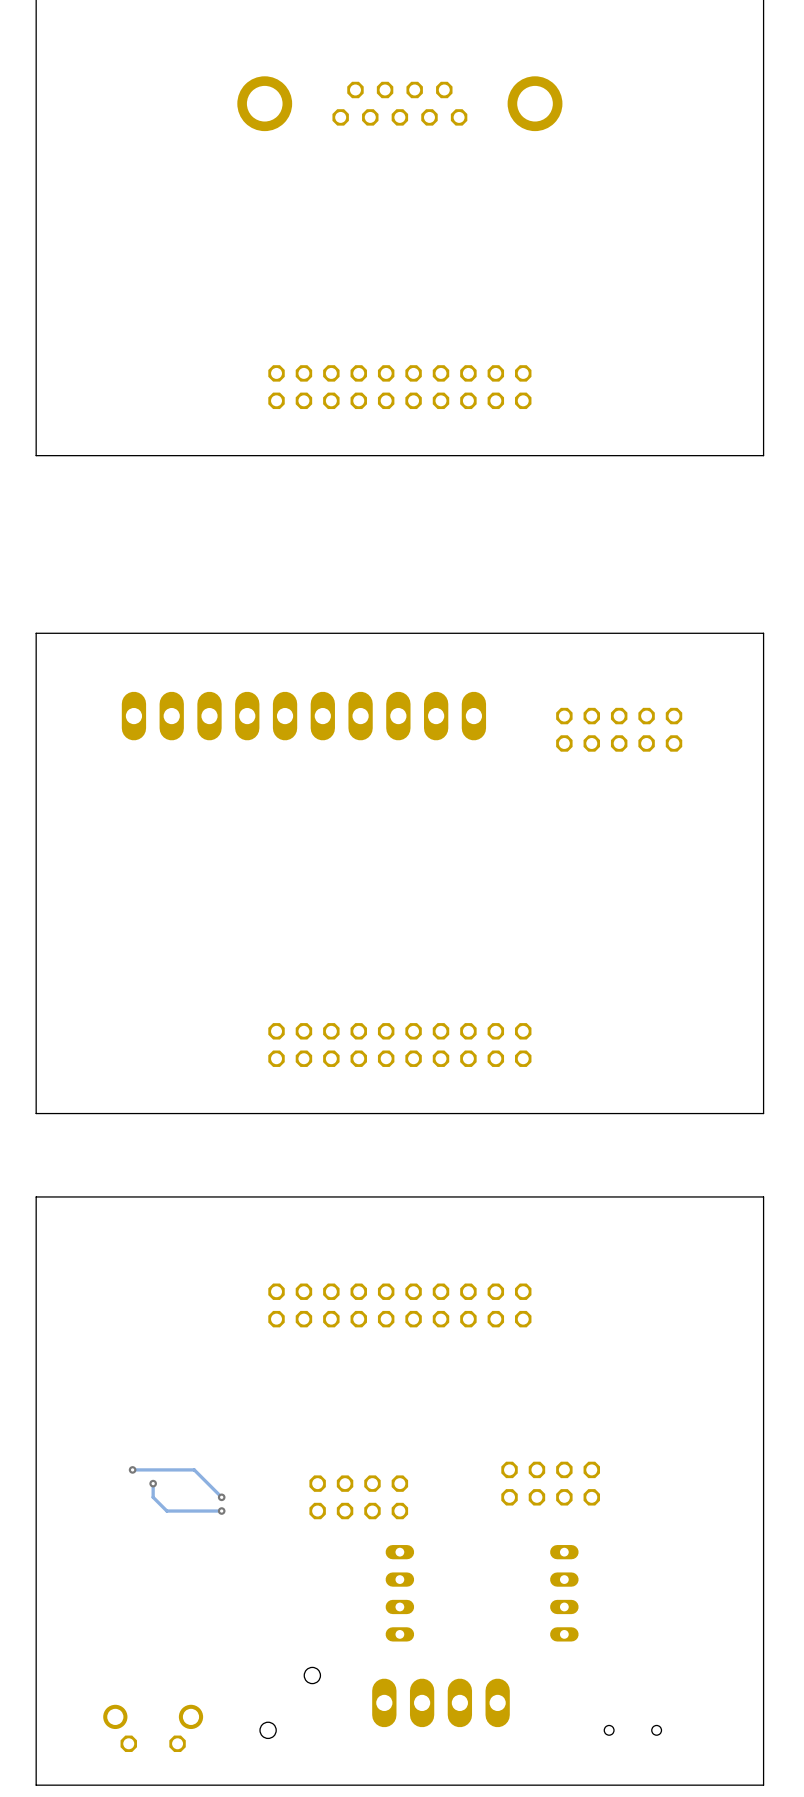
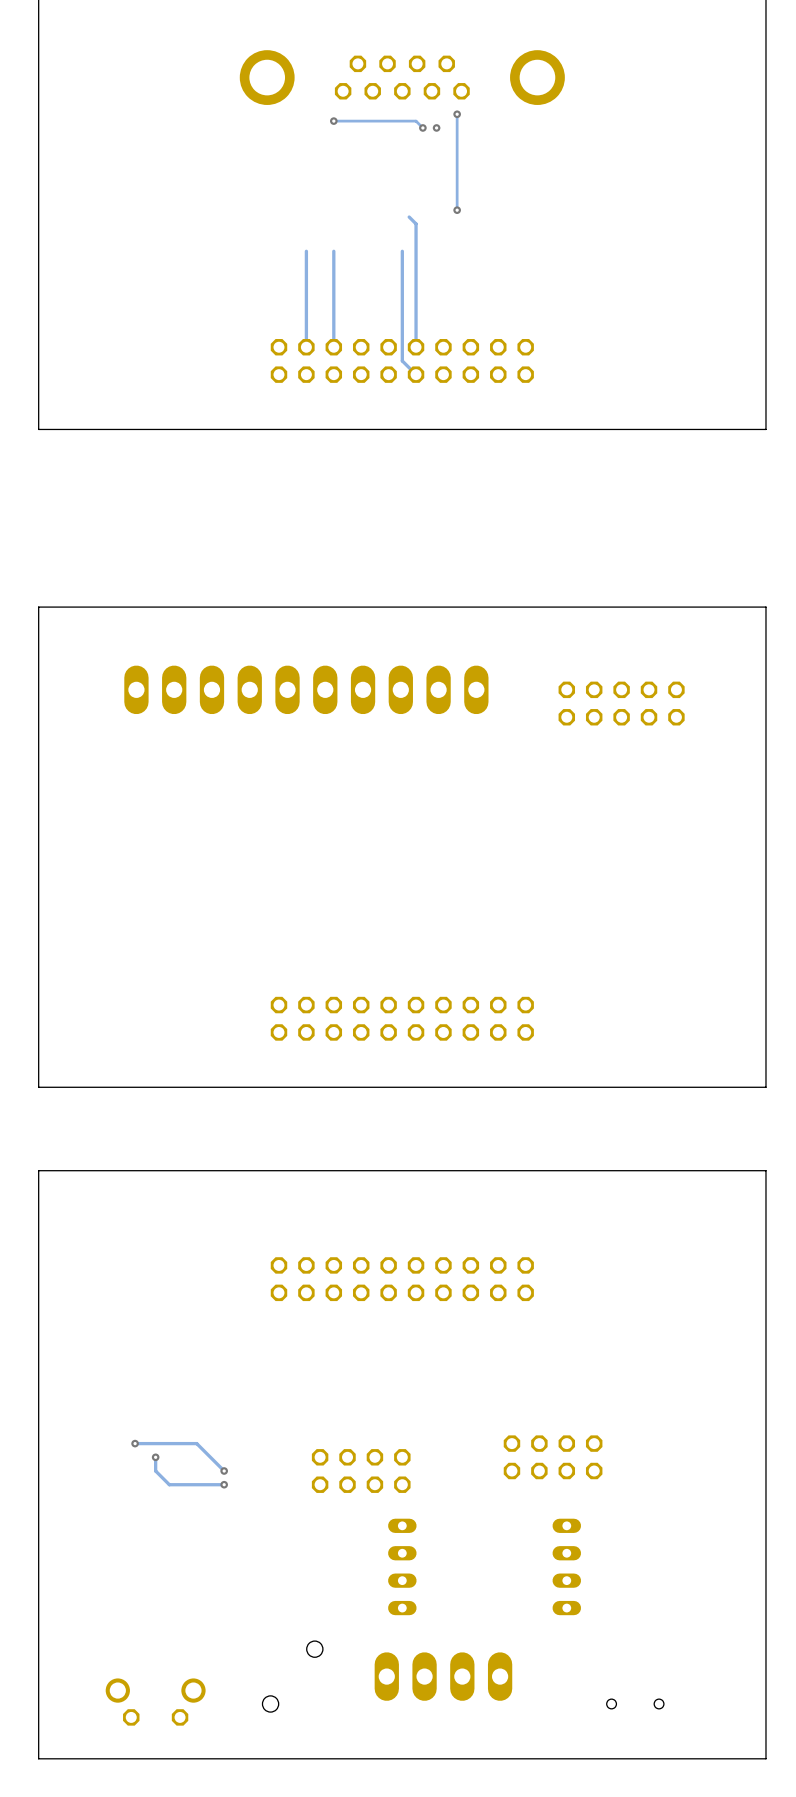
track: none -> (457, 114) (457, 210)
via: none -> (457, 114)
track: none -> (333, 121) (416, 121) (422, 127)
via: none -> (333, 121)
via: none -> (422, 127)
via: none -> (436, 127)
via: none -> (457, 210)
track: none -> (409, 217) (416, 223) (416, 347)
track: none -> (306, 251) (306, 347)
track: none -> (333, 251) (333, 347)
track: none -> (402, 251) (402, 360) (416, 374)

